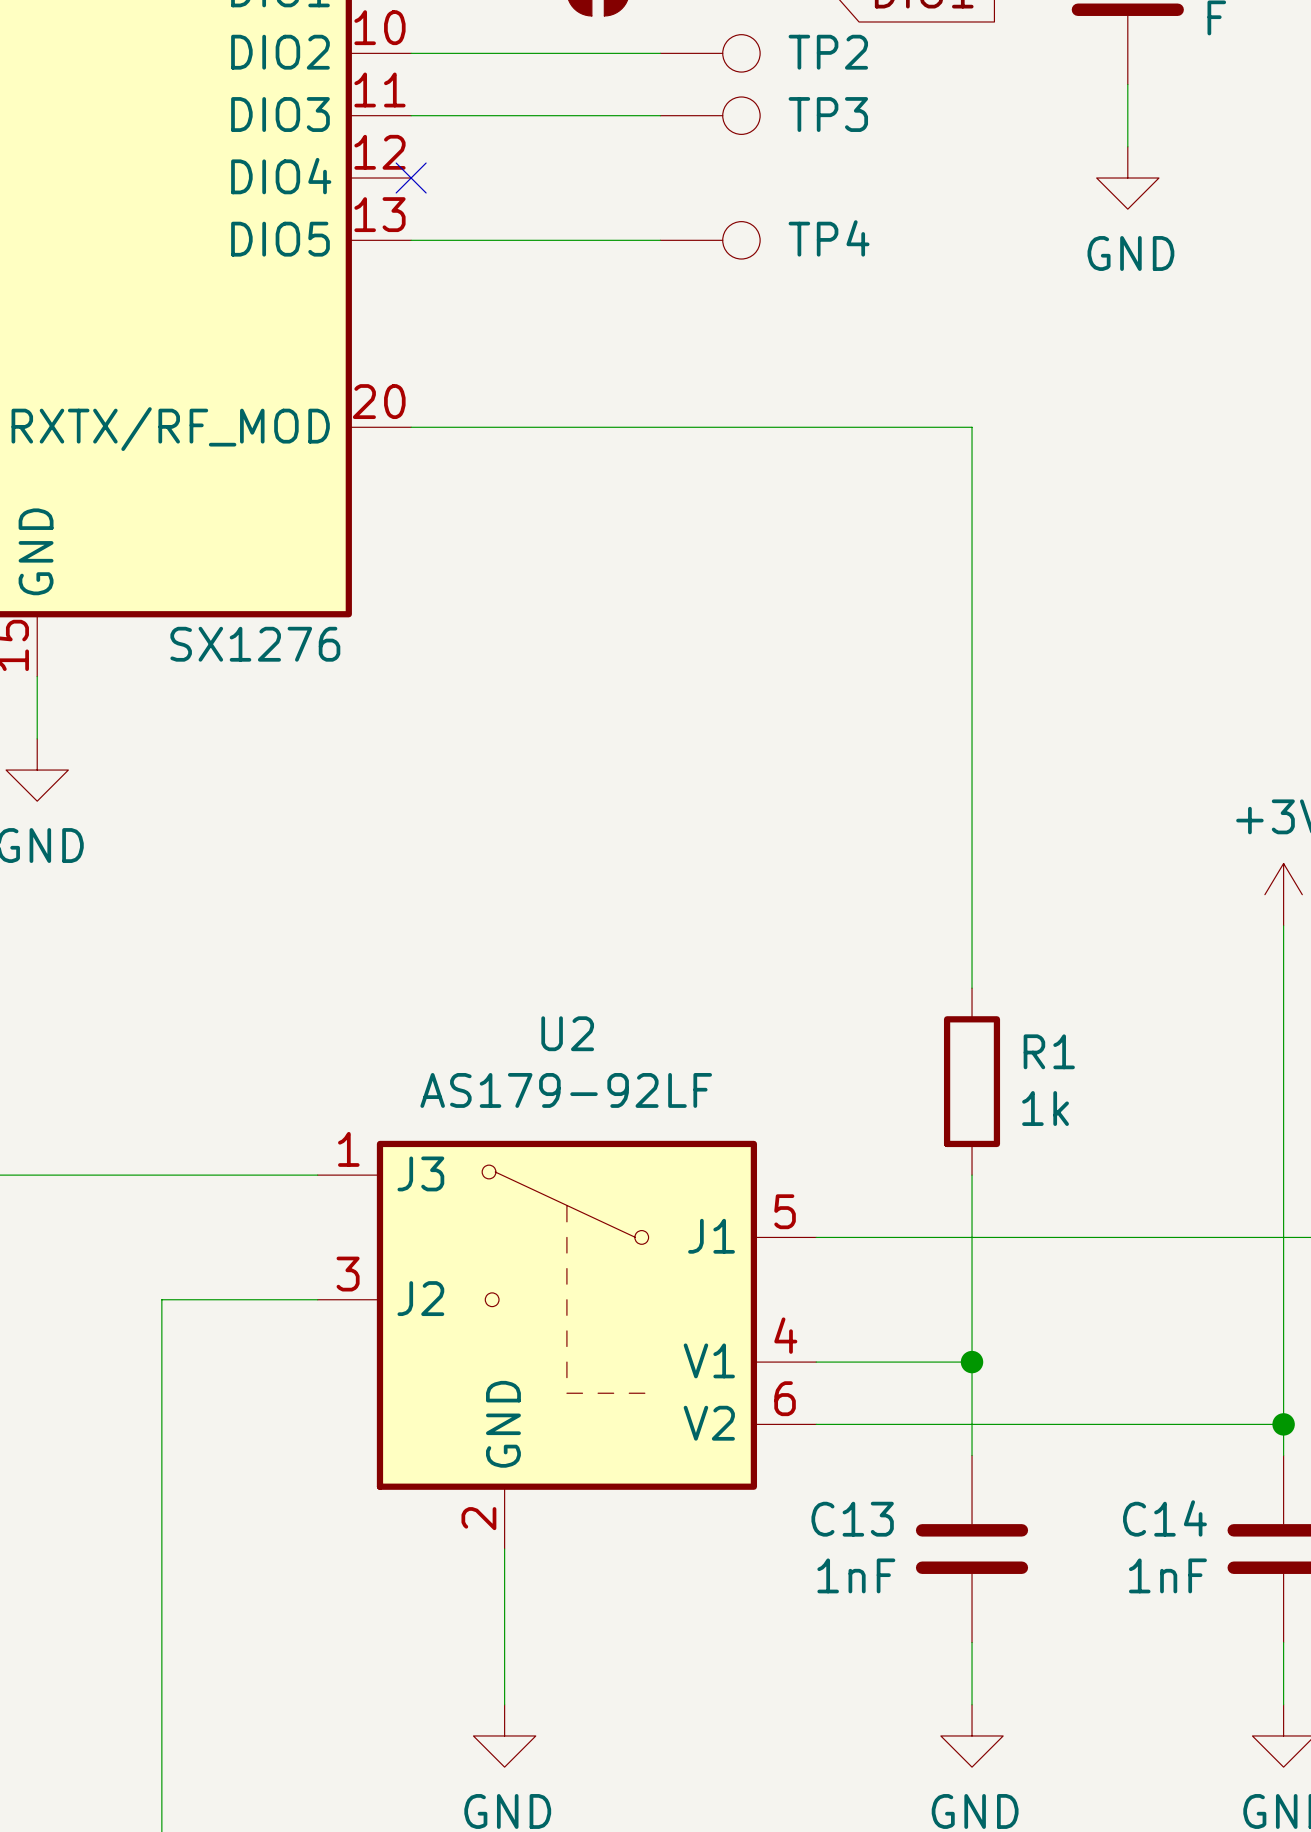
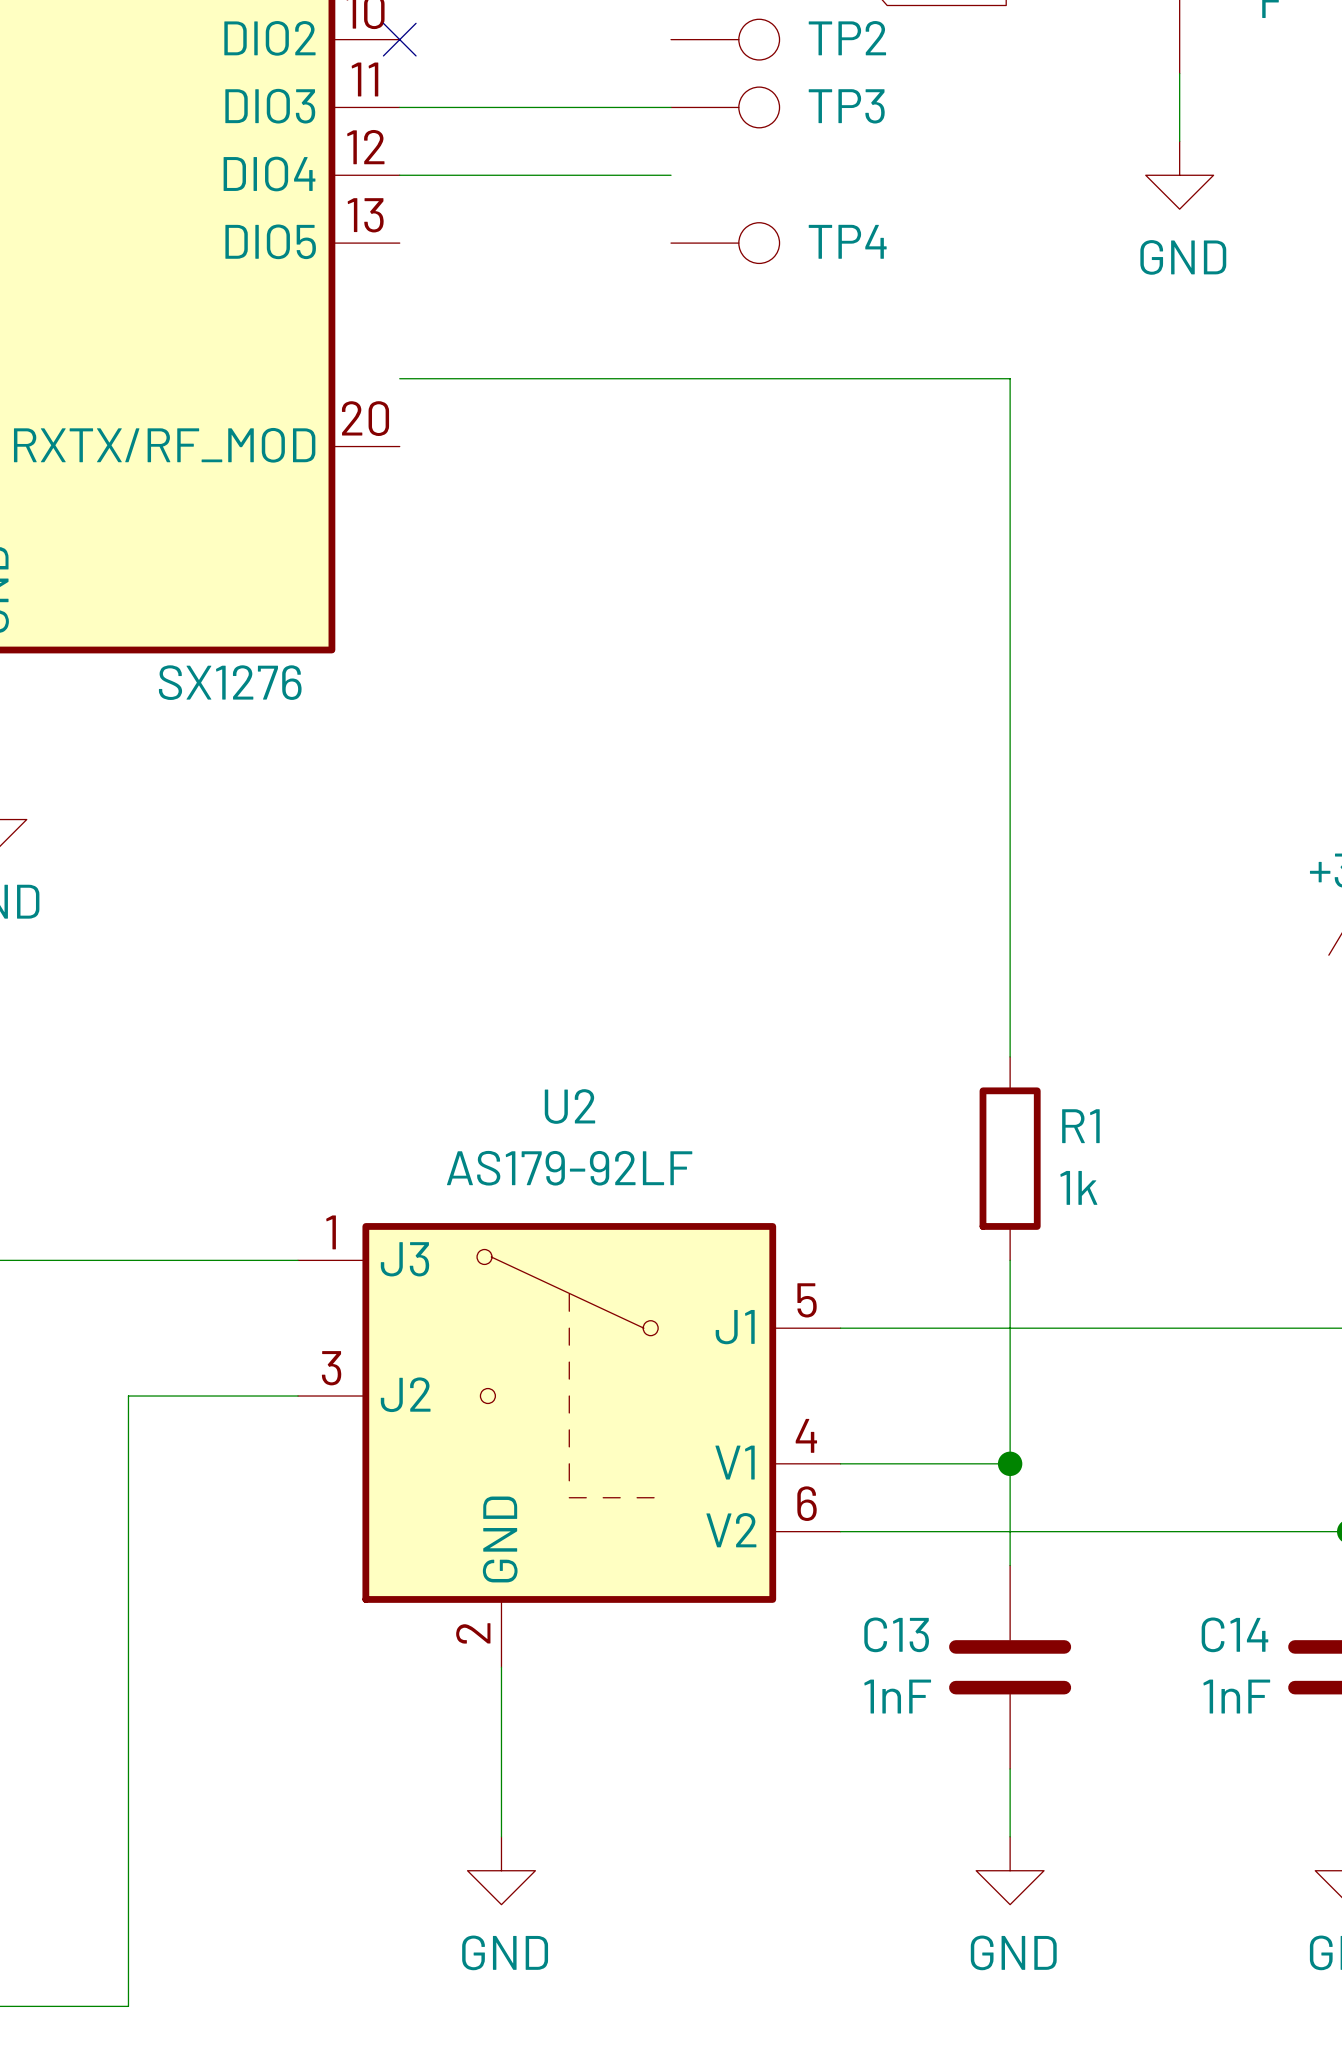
wire: (411, 53) (660, 53) -> none
no-connect mark position: (411, 178) -> (399, 39)
wire: (411, 240) (660, 240) -> (399, 175) (671, 175)
wire: (411, 427) (972, 427) -> (399, 378) (1010, 378) (1010, 446)

